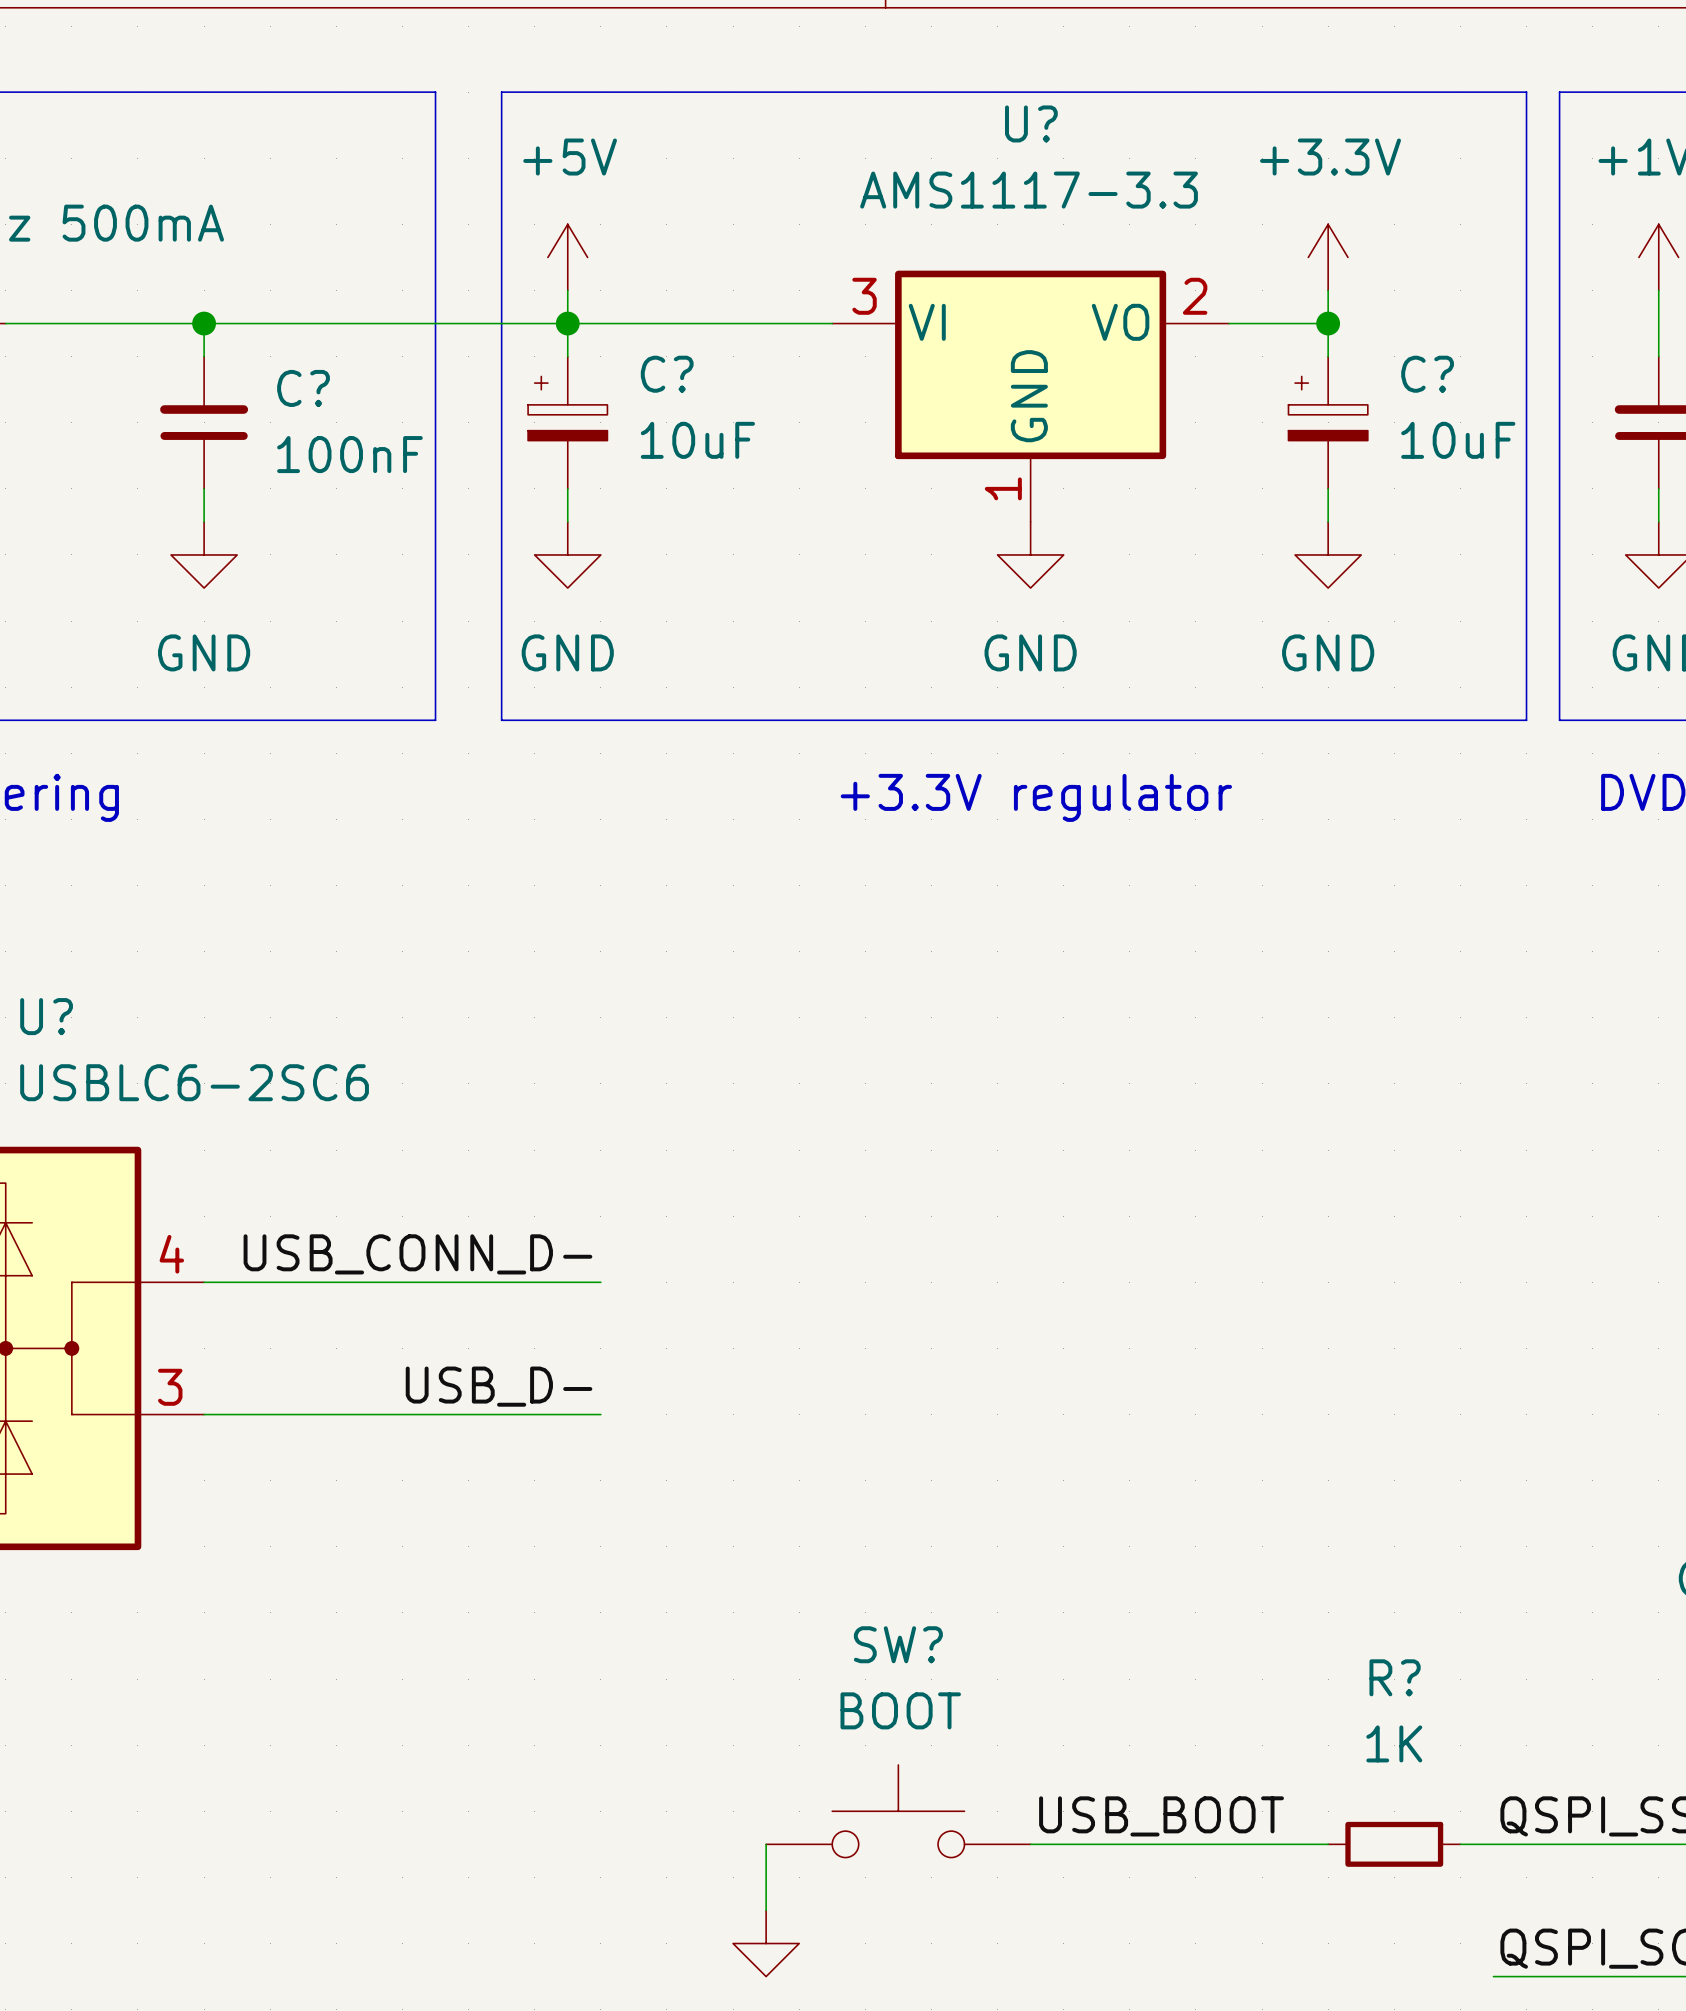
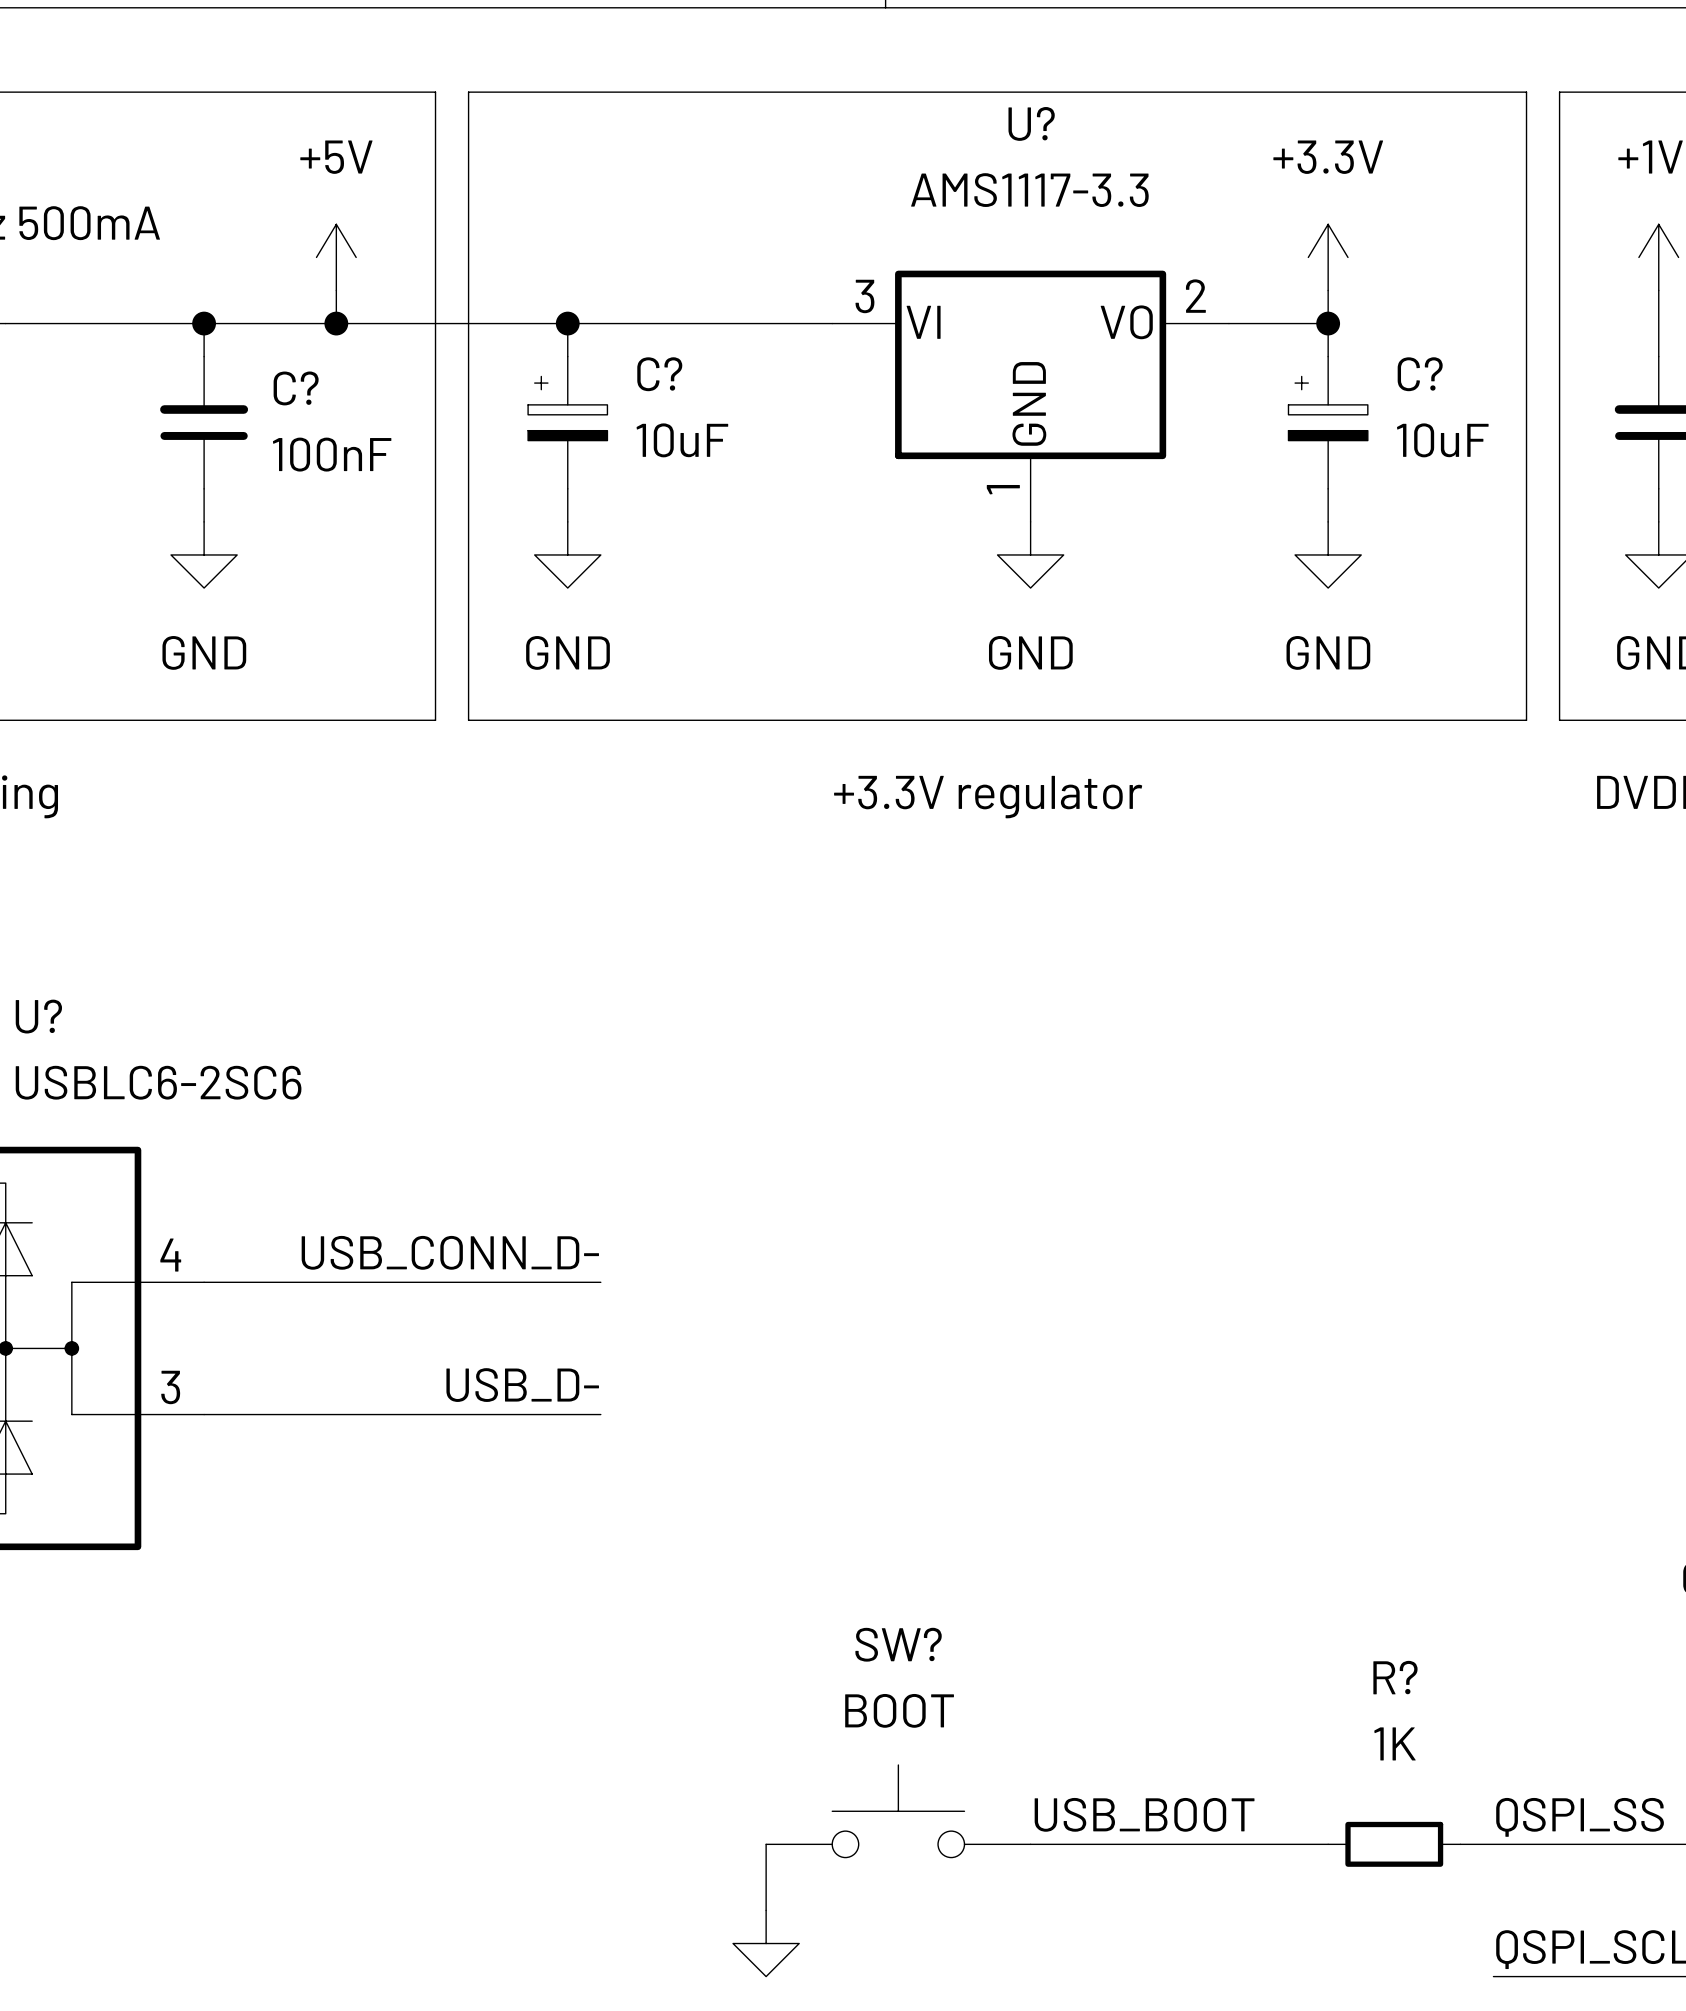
line: (501, 92) (501, 720) -> (501, 92) (468, 92) (468, 720) (501, 720)
power symbol position: +5V (567, 257) -> +5V (336, 257)
wire: (567, 290) (567, 323) -> (336, 290) (336, 323)
junction: none -> (336, 323)

